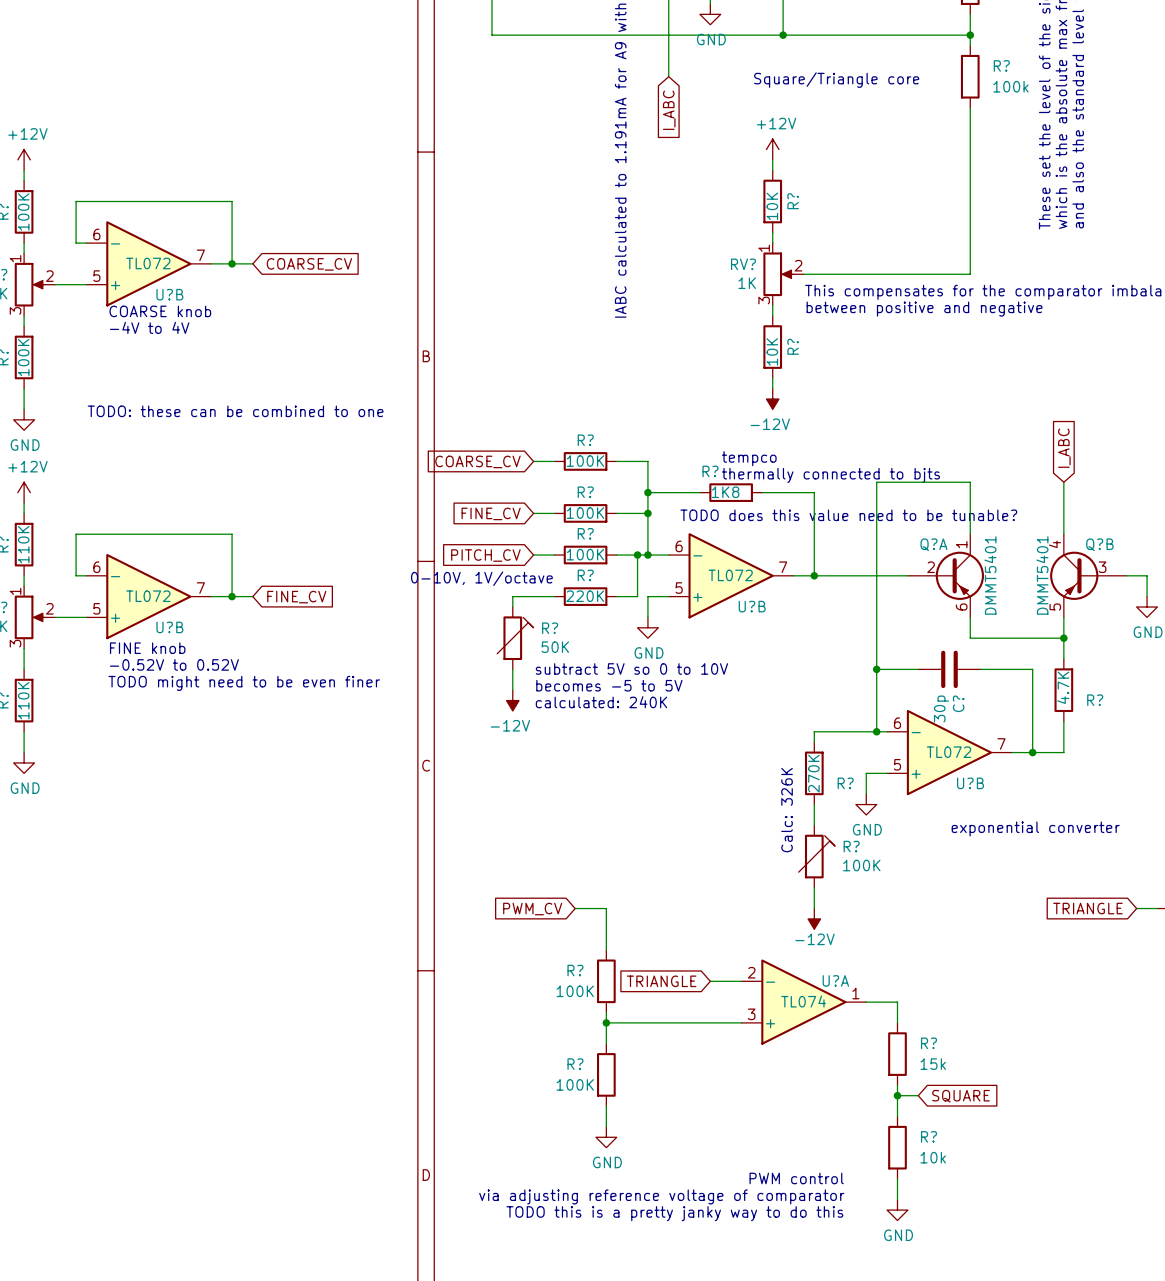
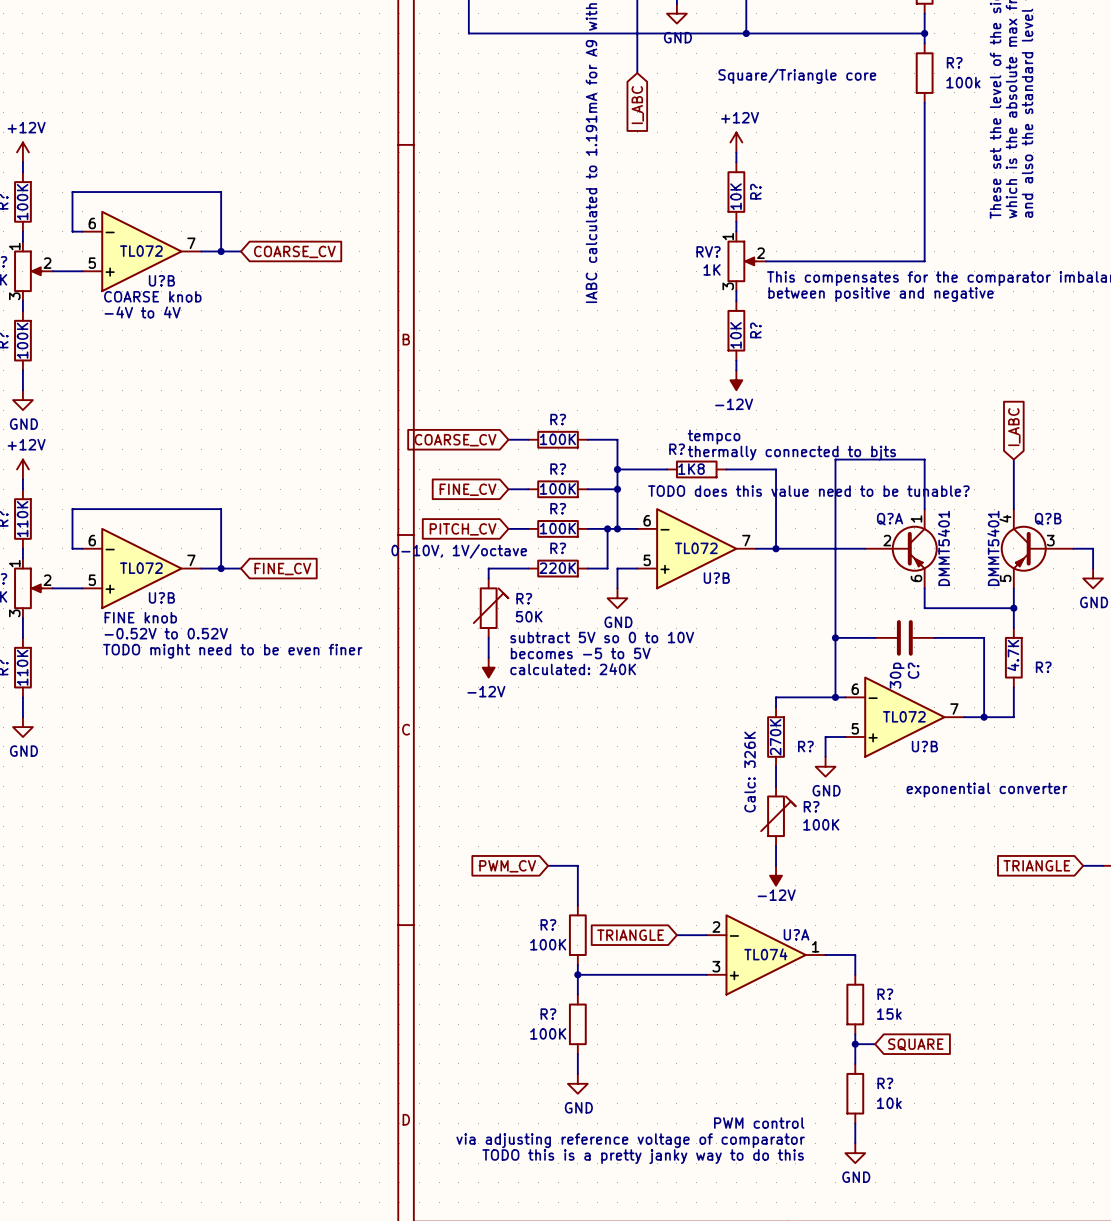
text: TODO: these can be combined to one (235, 411) -> none

